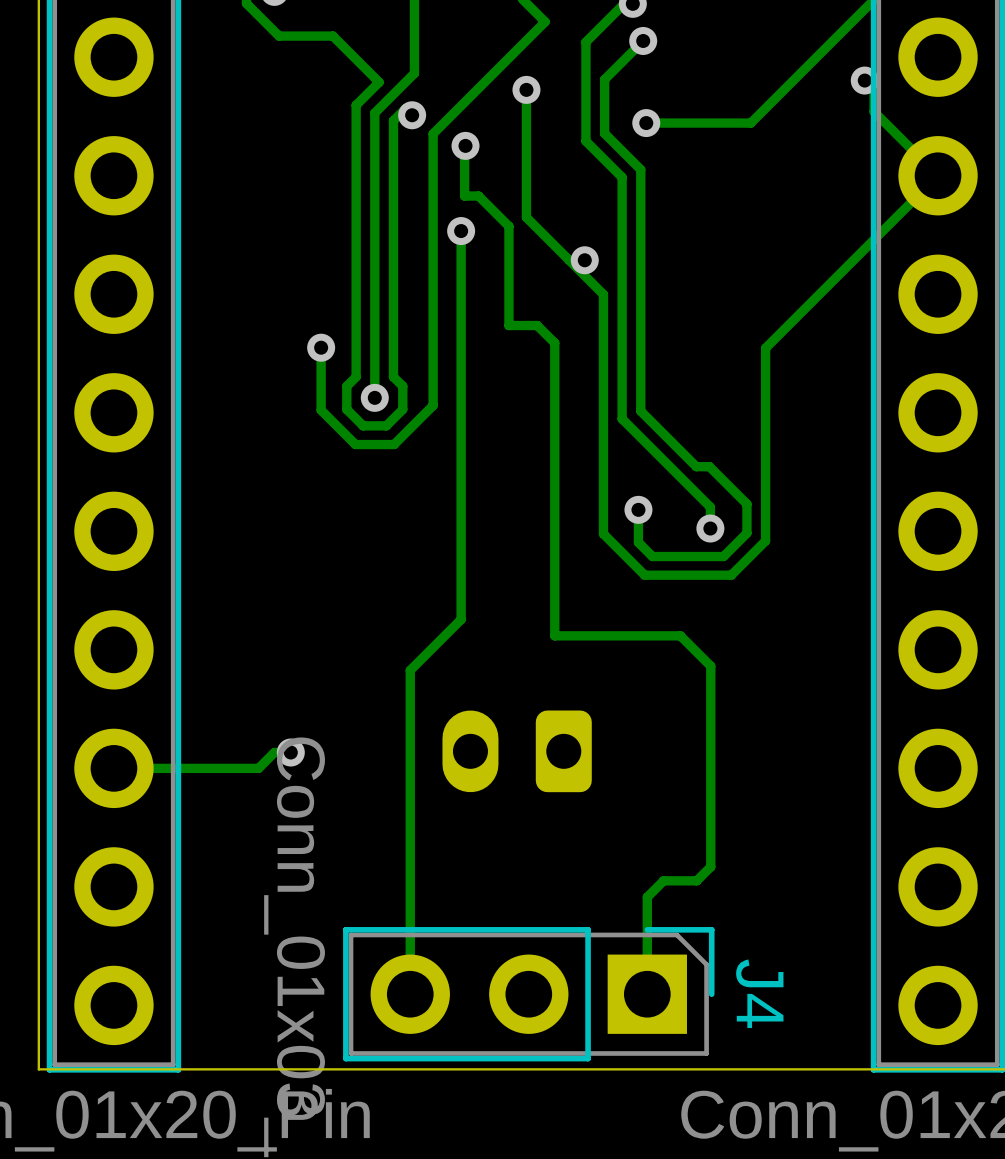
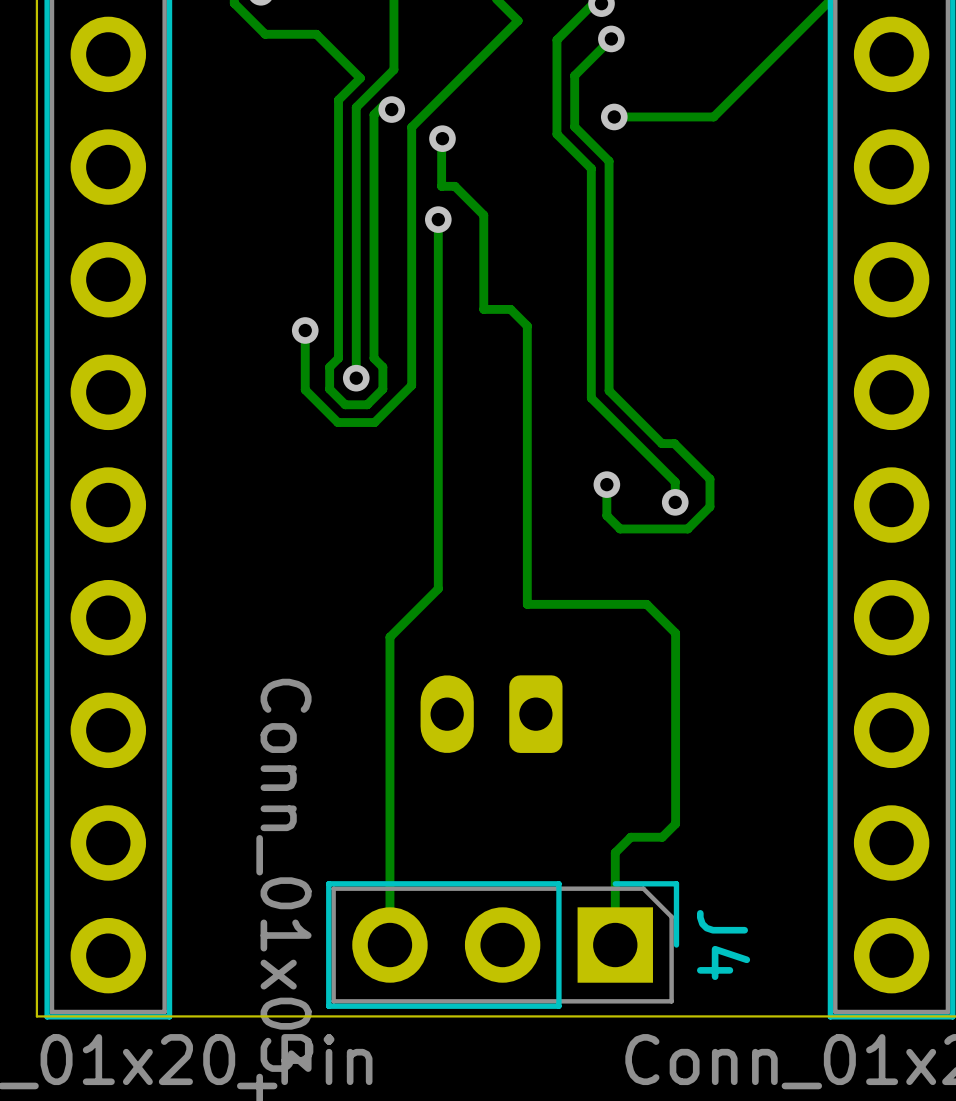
track: (864, 80) (874, 89) (874, 111) (938, 175) (765, 348) (765, 540) (731, 575) (644, 575) (603, 533) (603, 294) (526, 217) (526, 89) -> none
via: (864, 80) -> none
via: (526, 89) -> none
via: (584, 260) -> none
track: (290, 752) (274, 752) (258, 768) (113, 768) -> none
via: (290, 752) -> none

